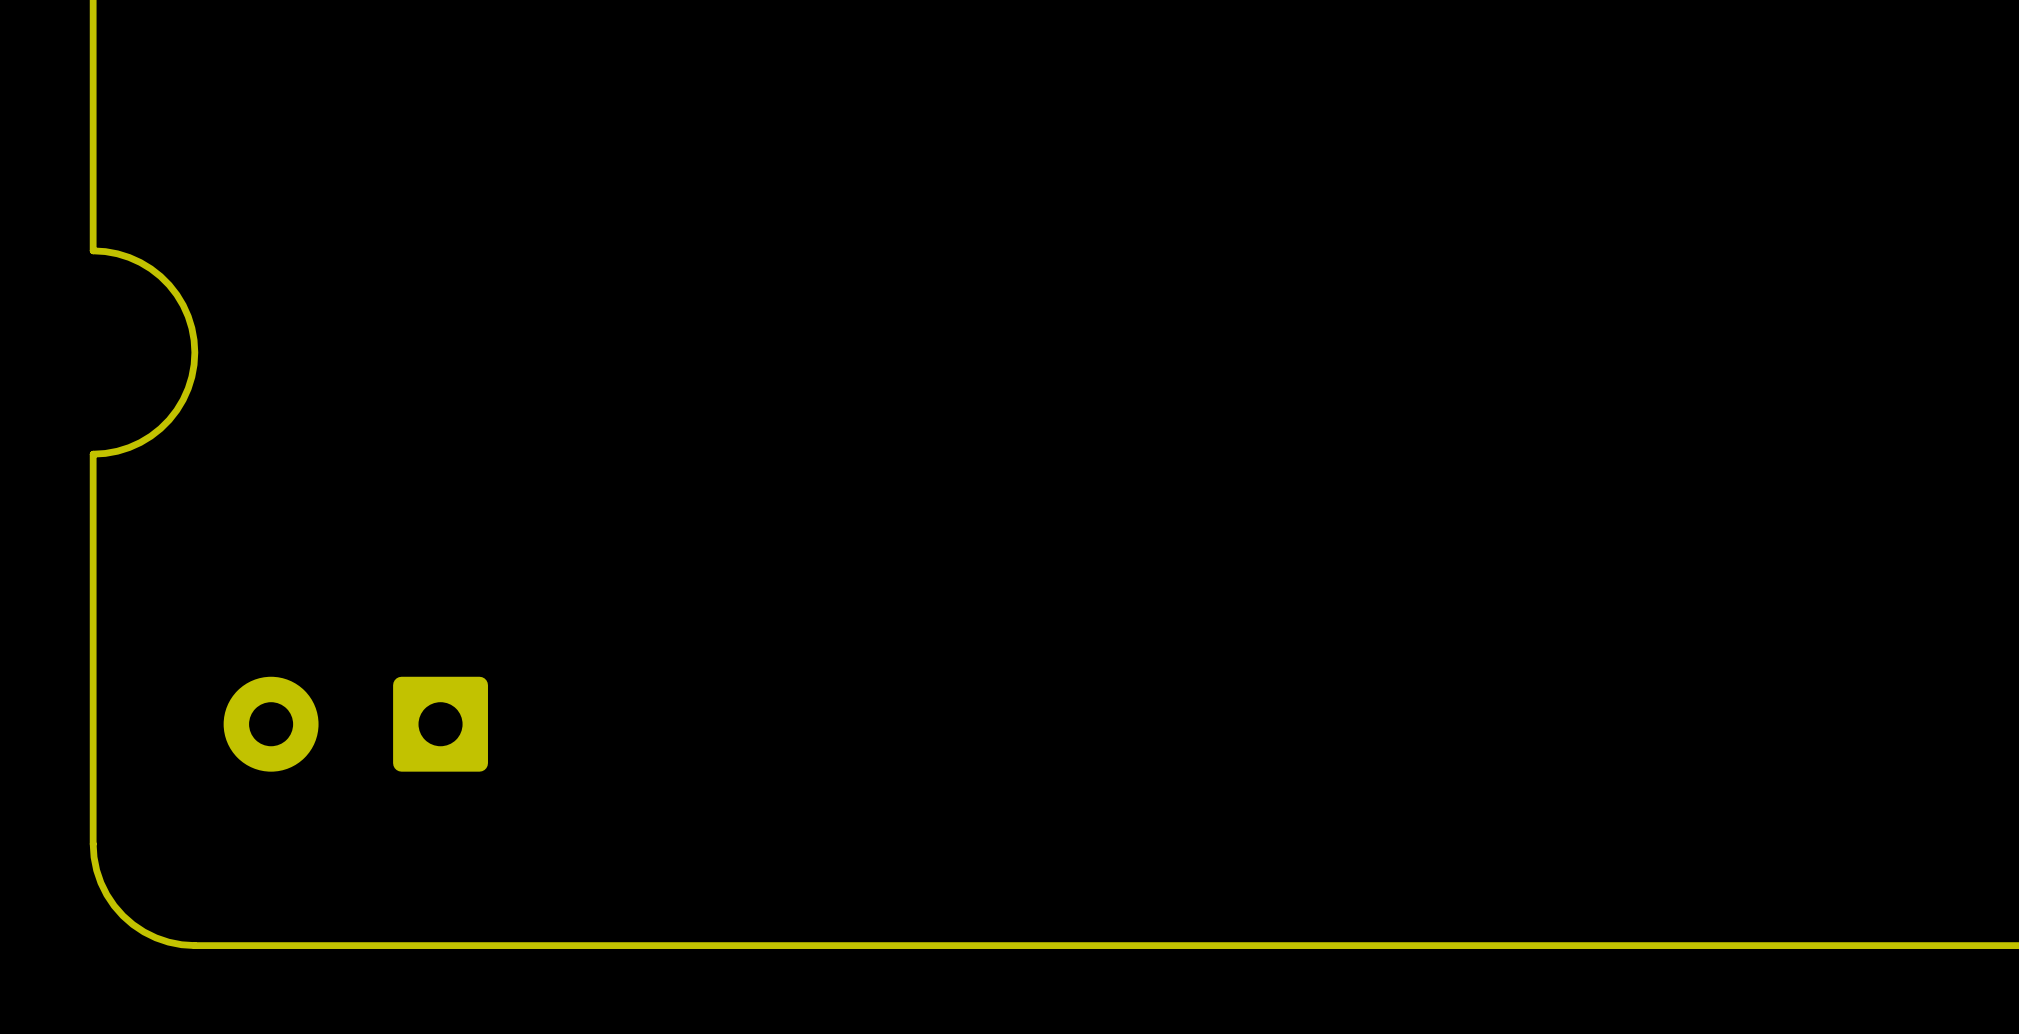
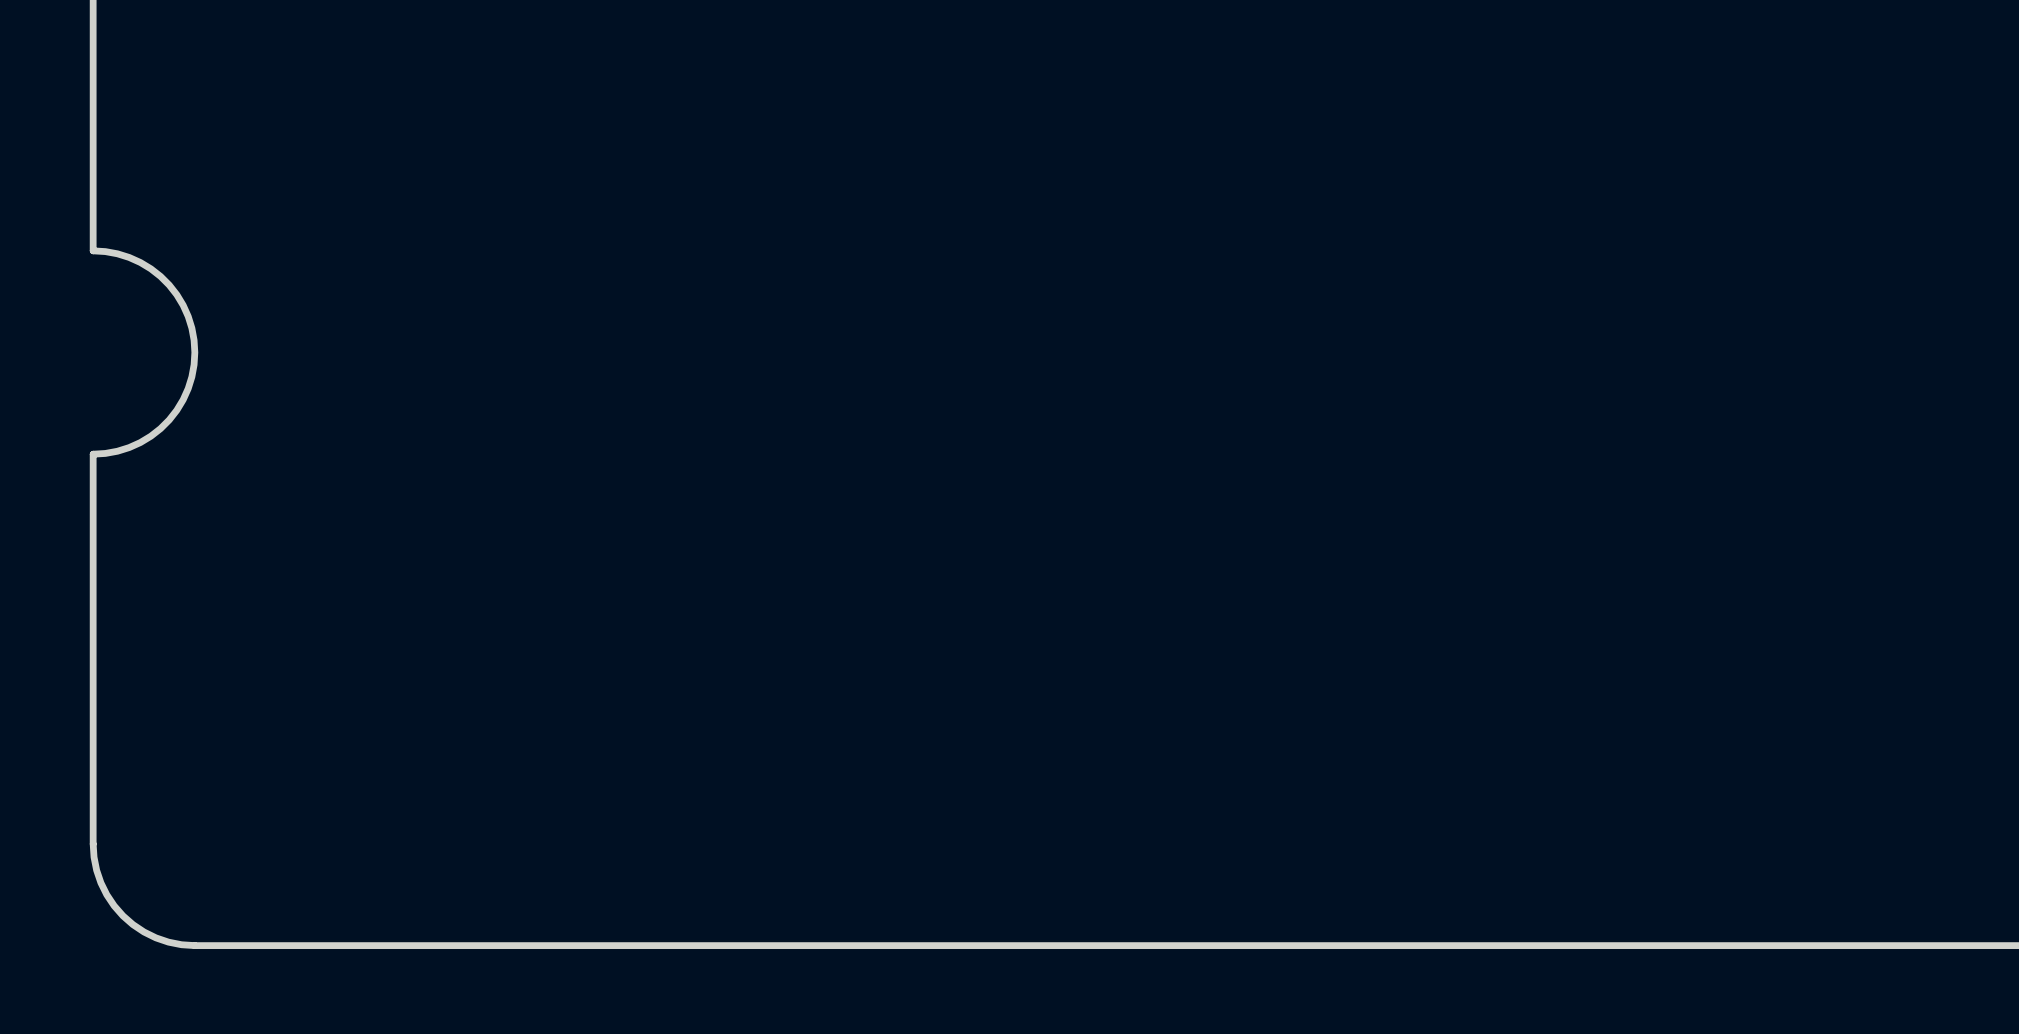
part: (355, 724) -> none

